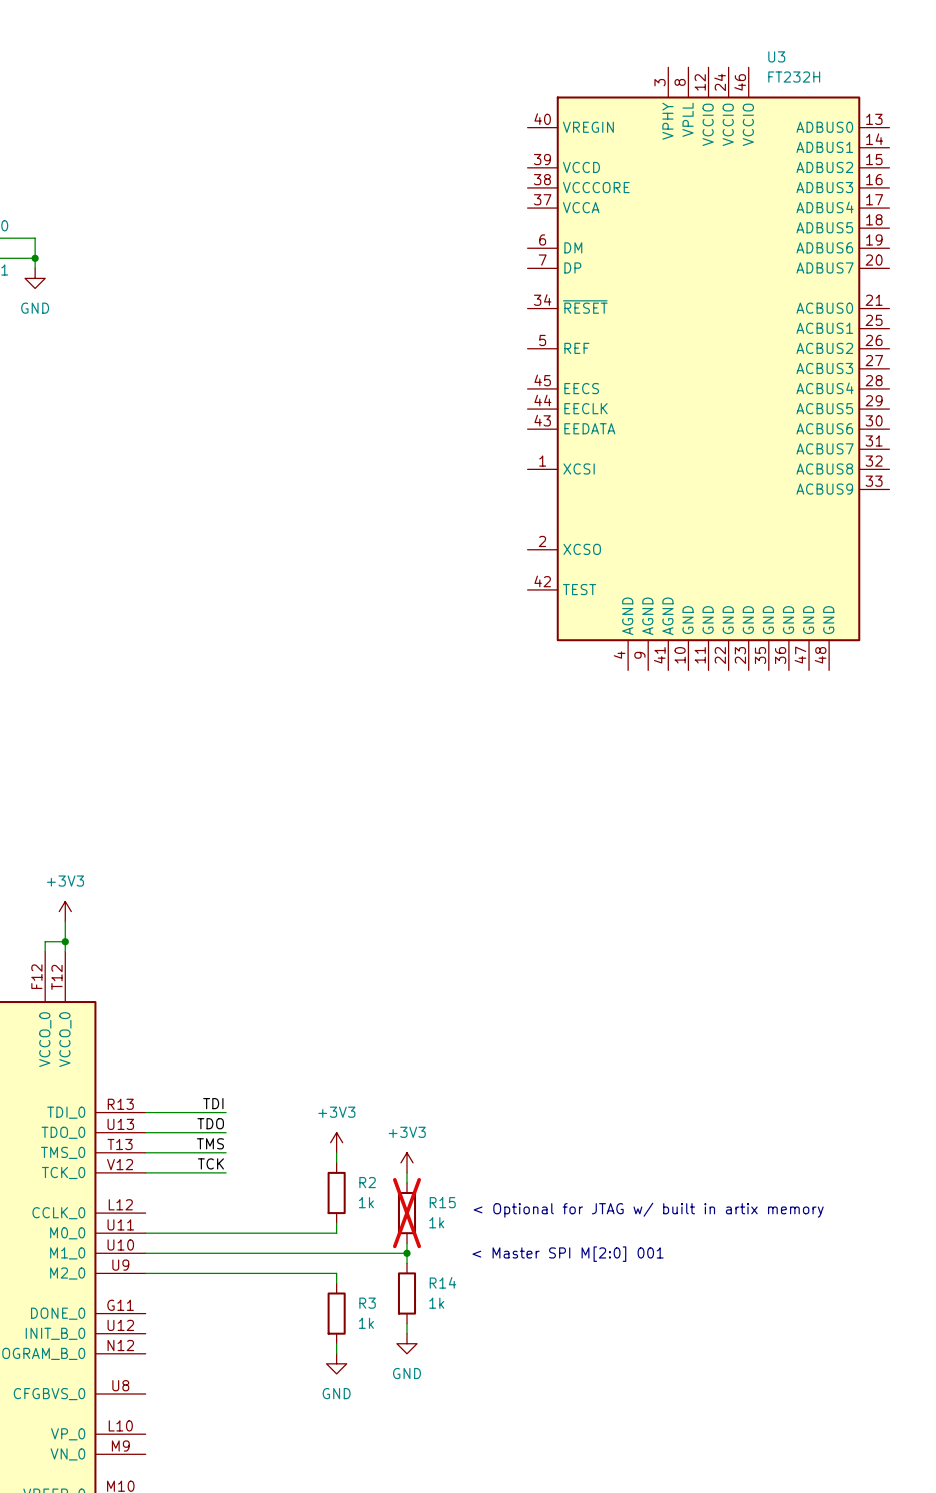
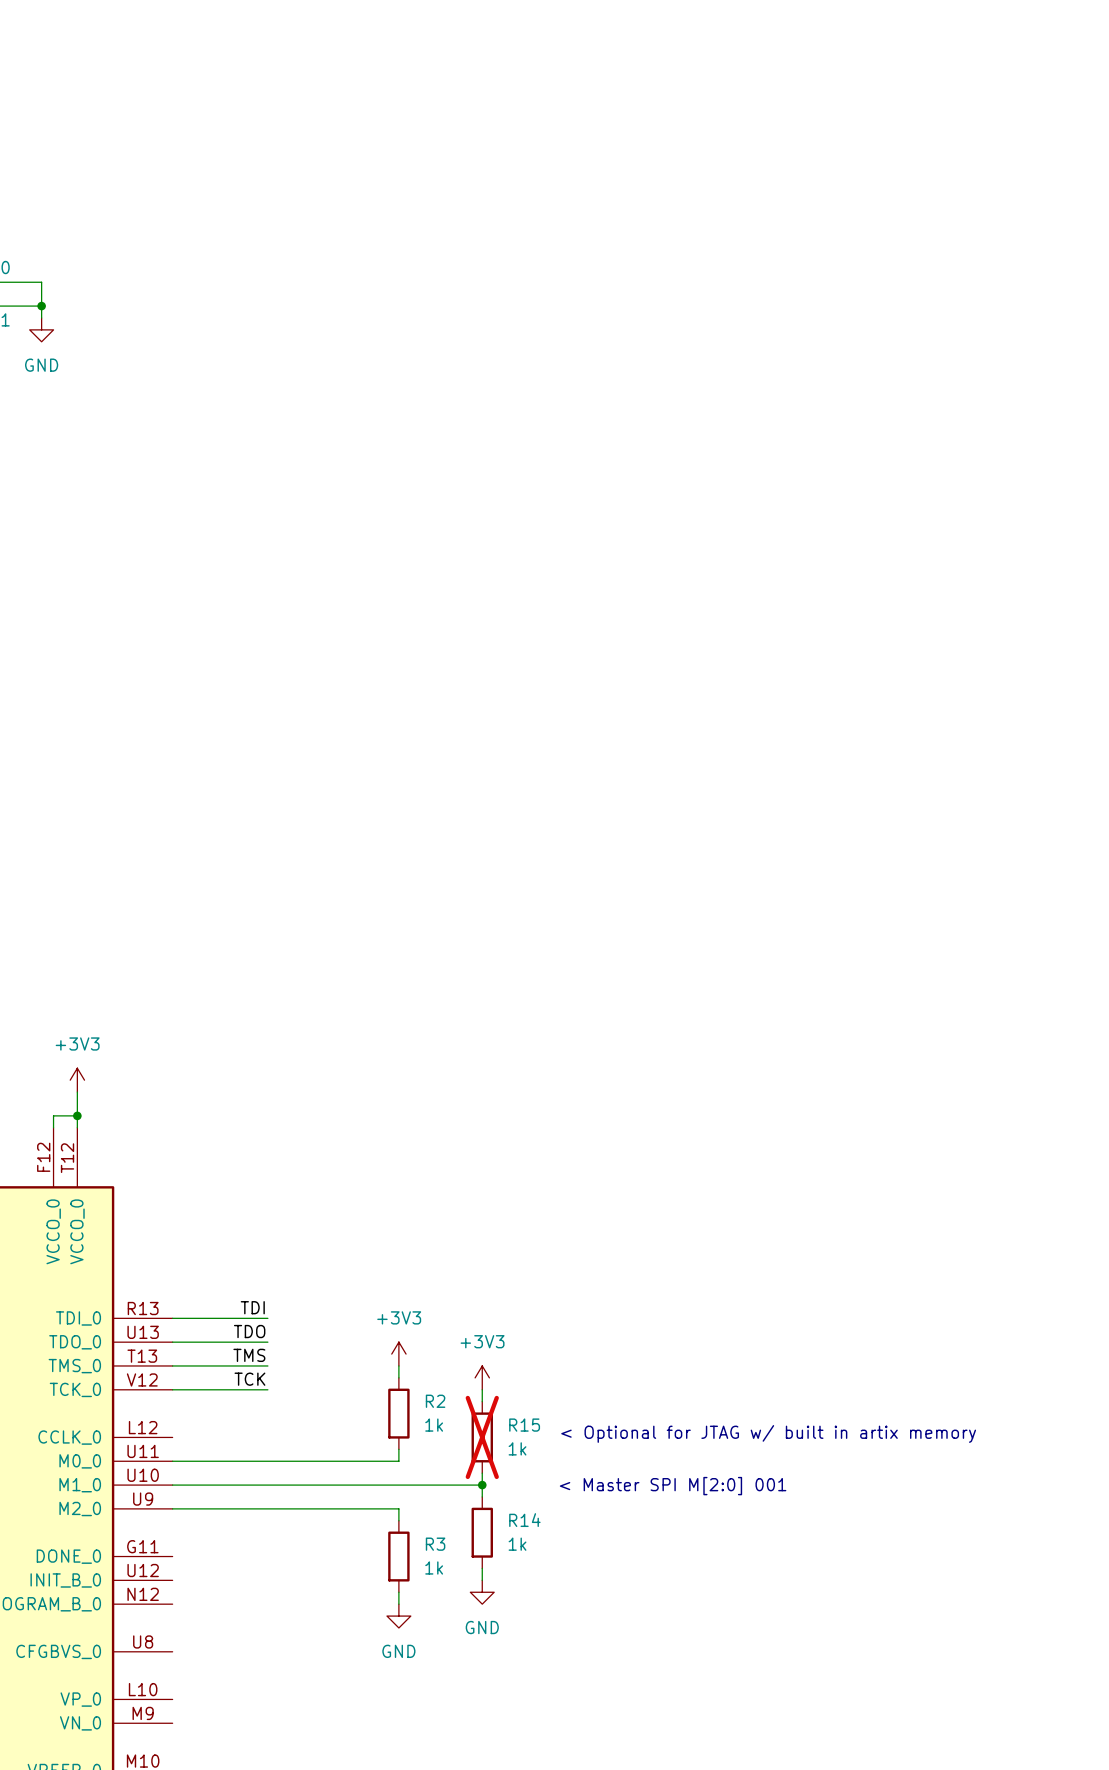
U3: FT232H (708, 368) -> none

